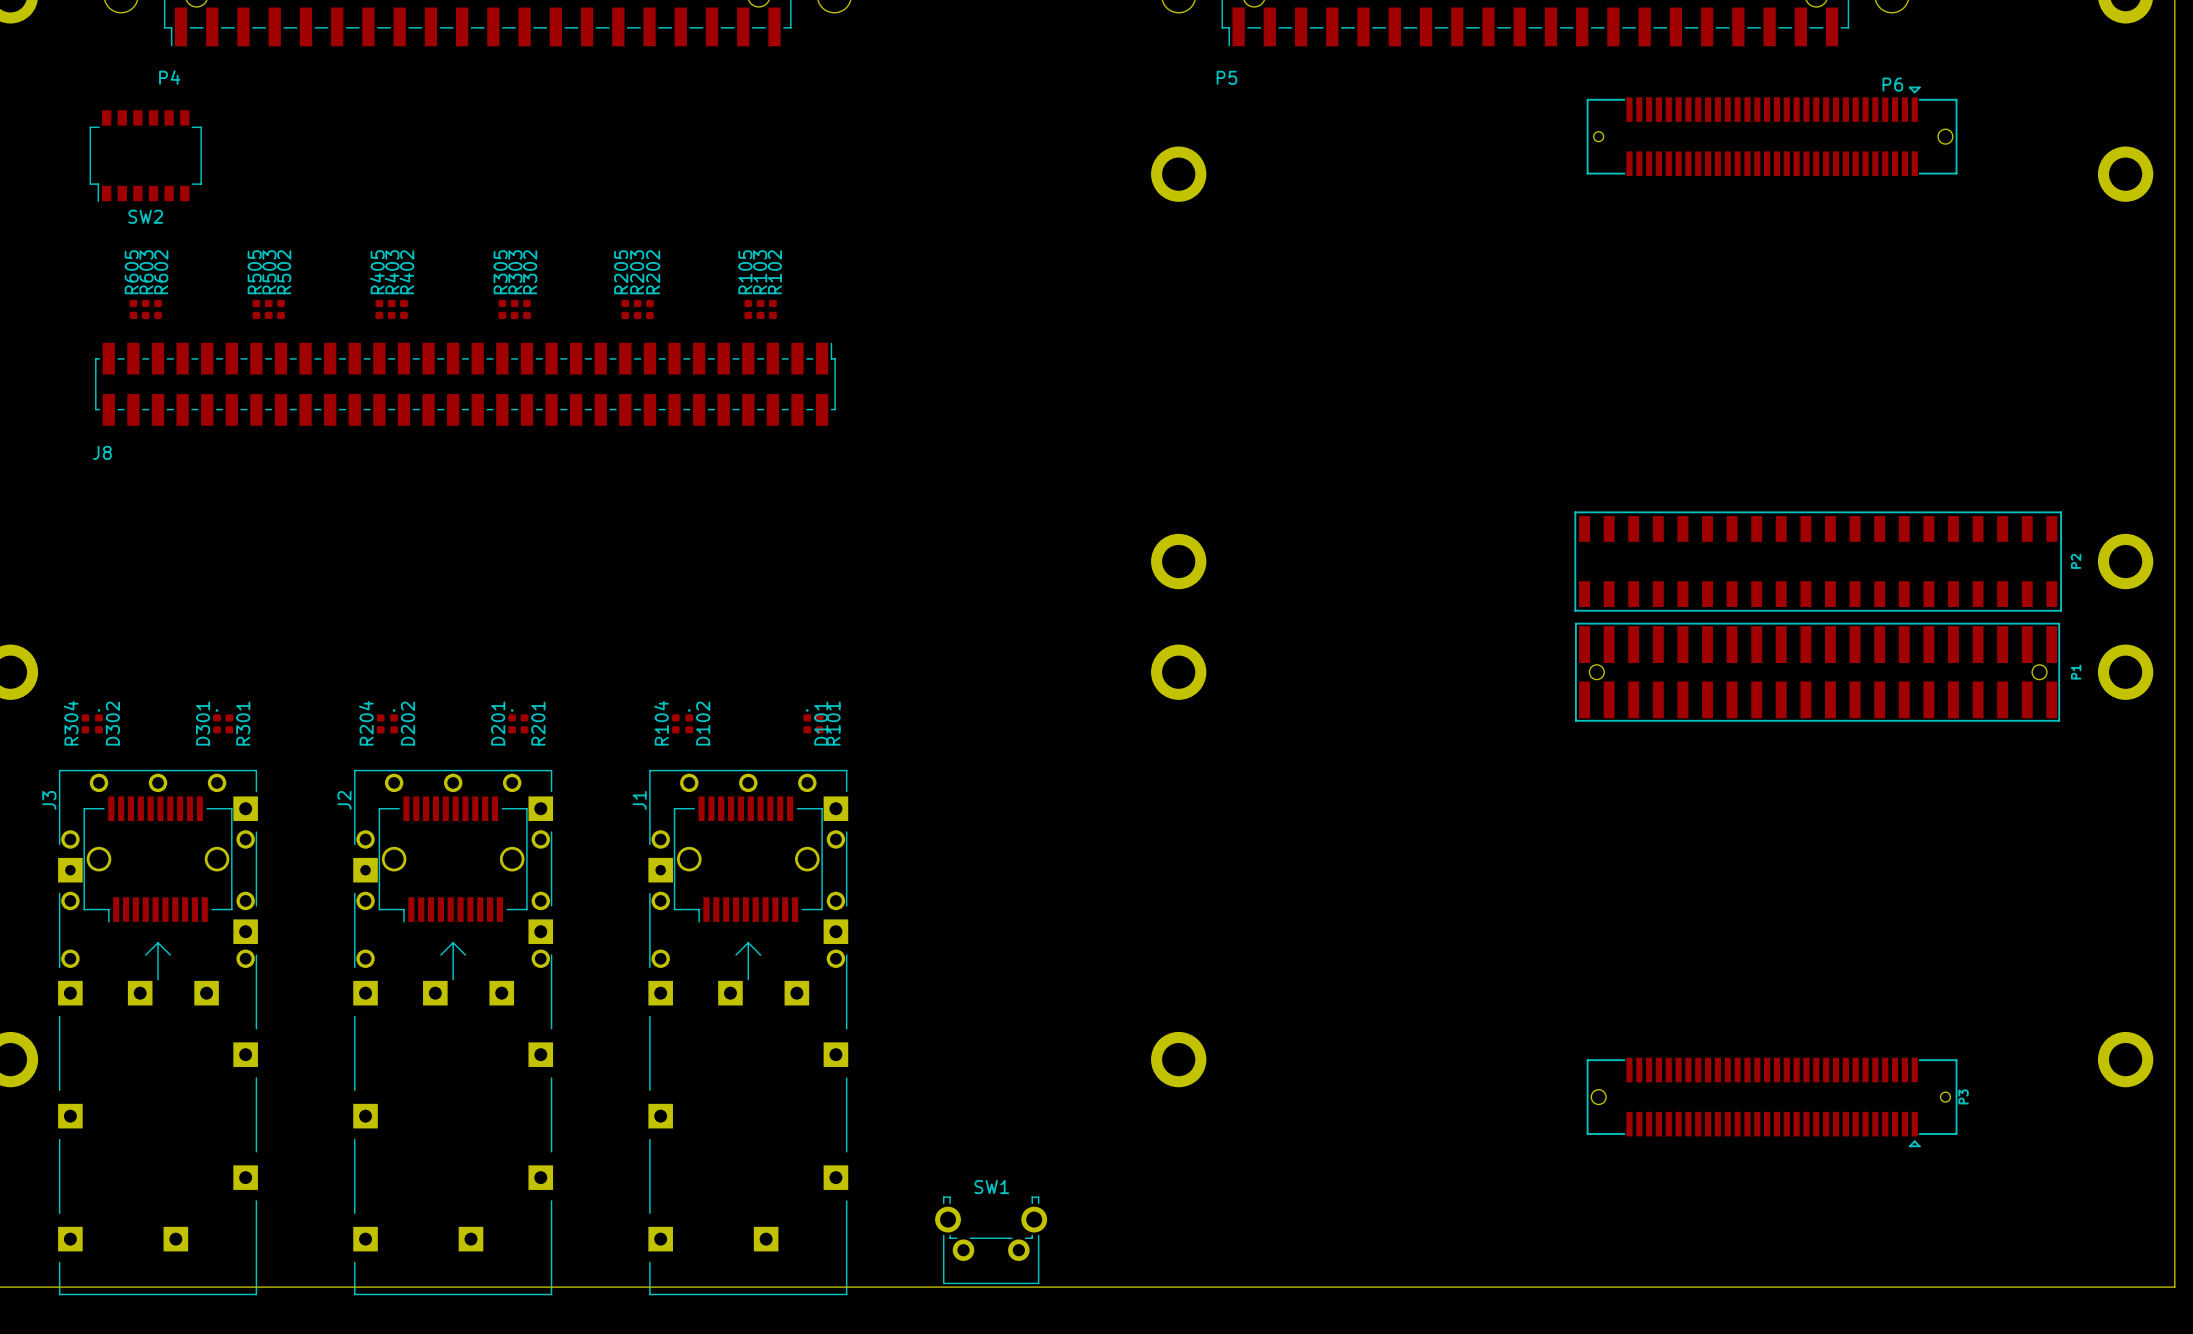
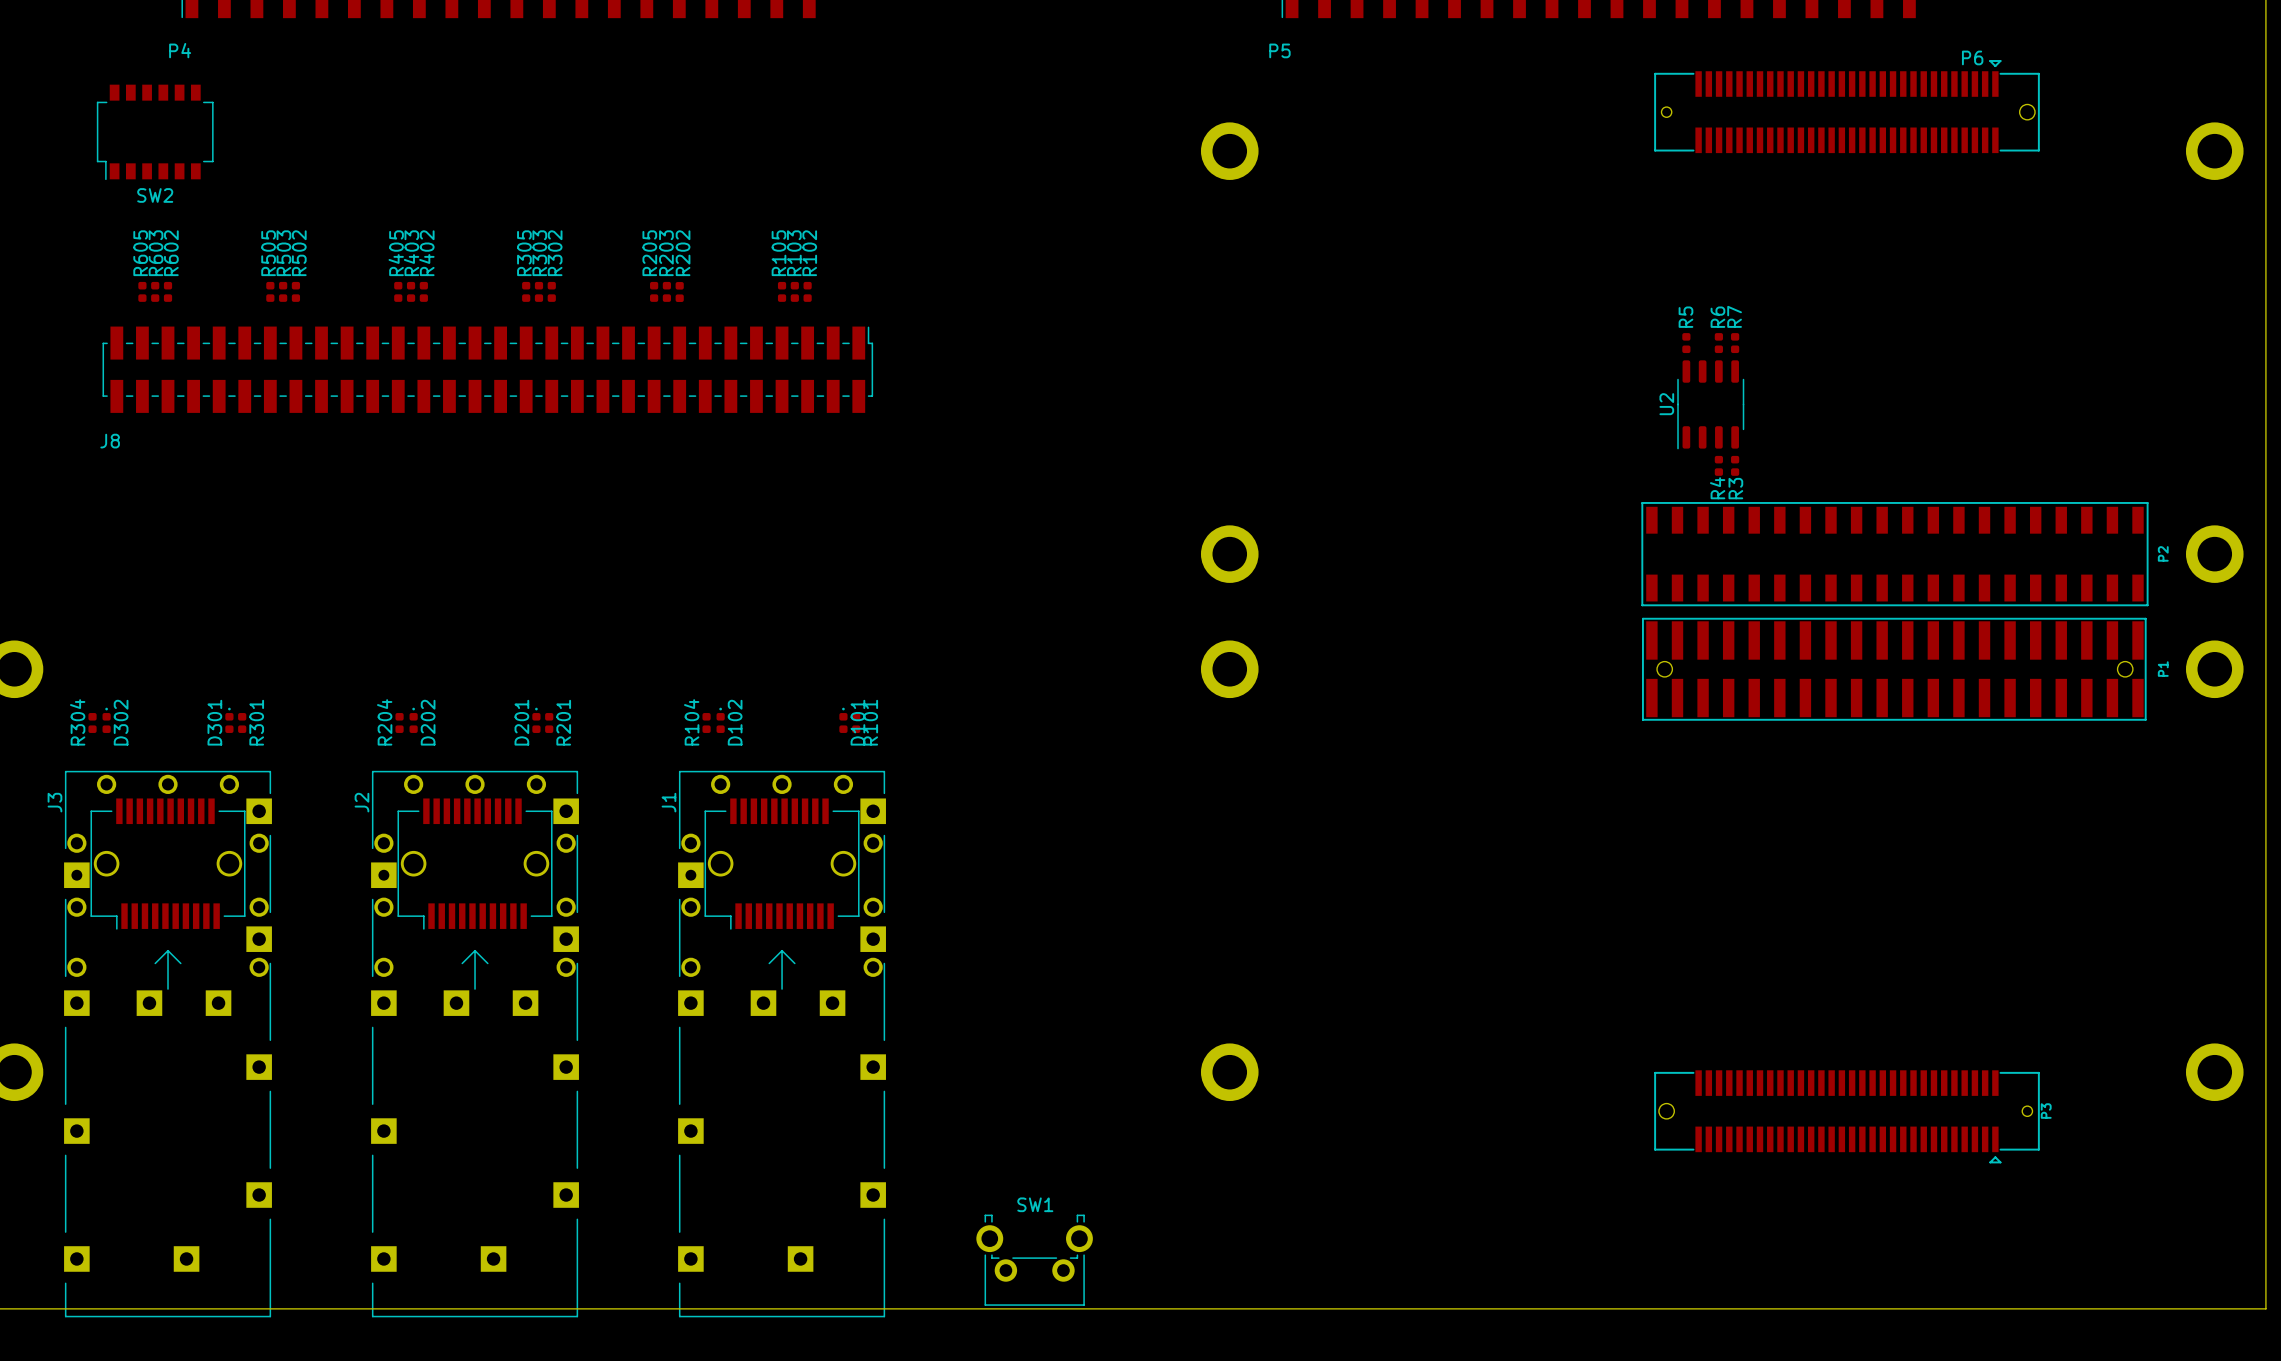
R5: none -> (1686, 343)
R6: none -> (1718, 343)
R7: none -> (1735, 343)
U2: none -> (1710, 404)
R4: none -> (1718, 465)
R3: none -> (1735, 465)

